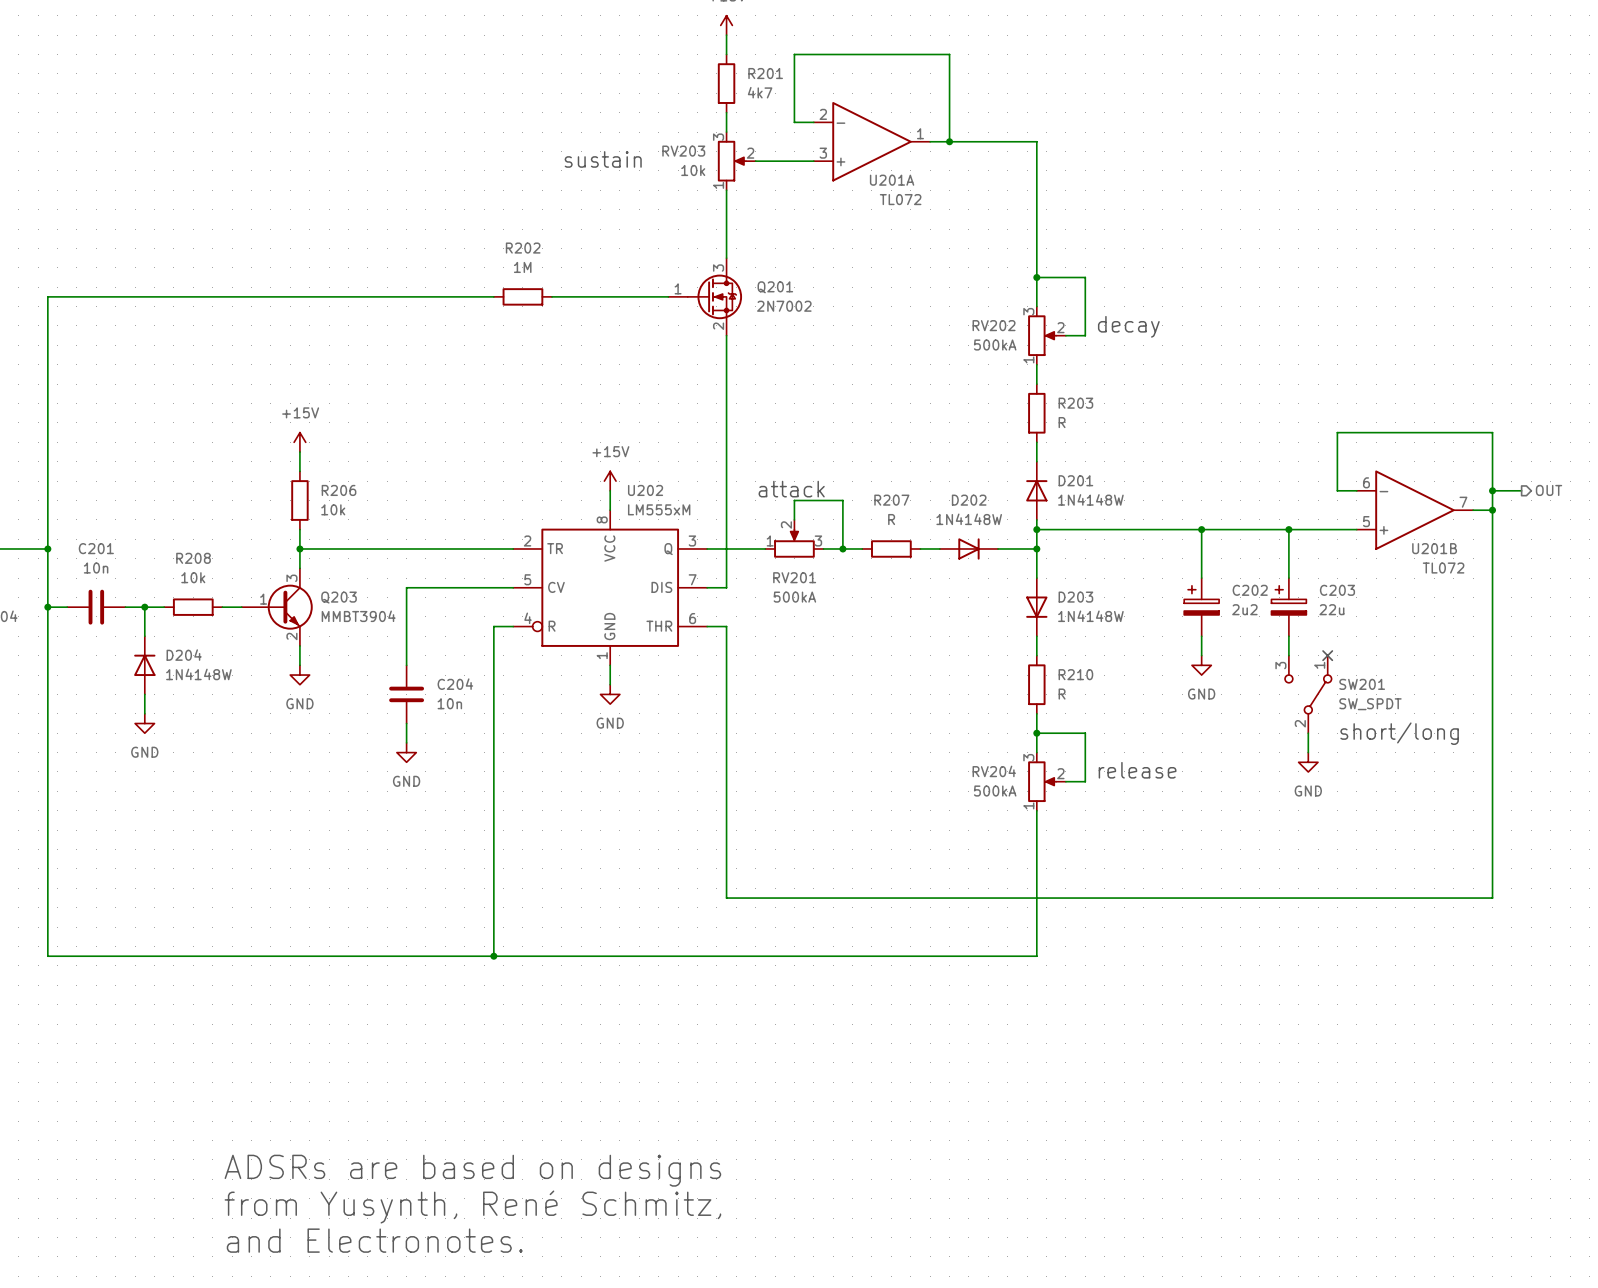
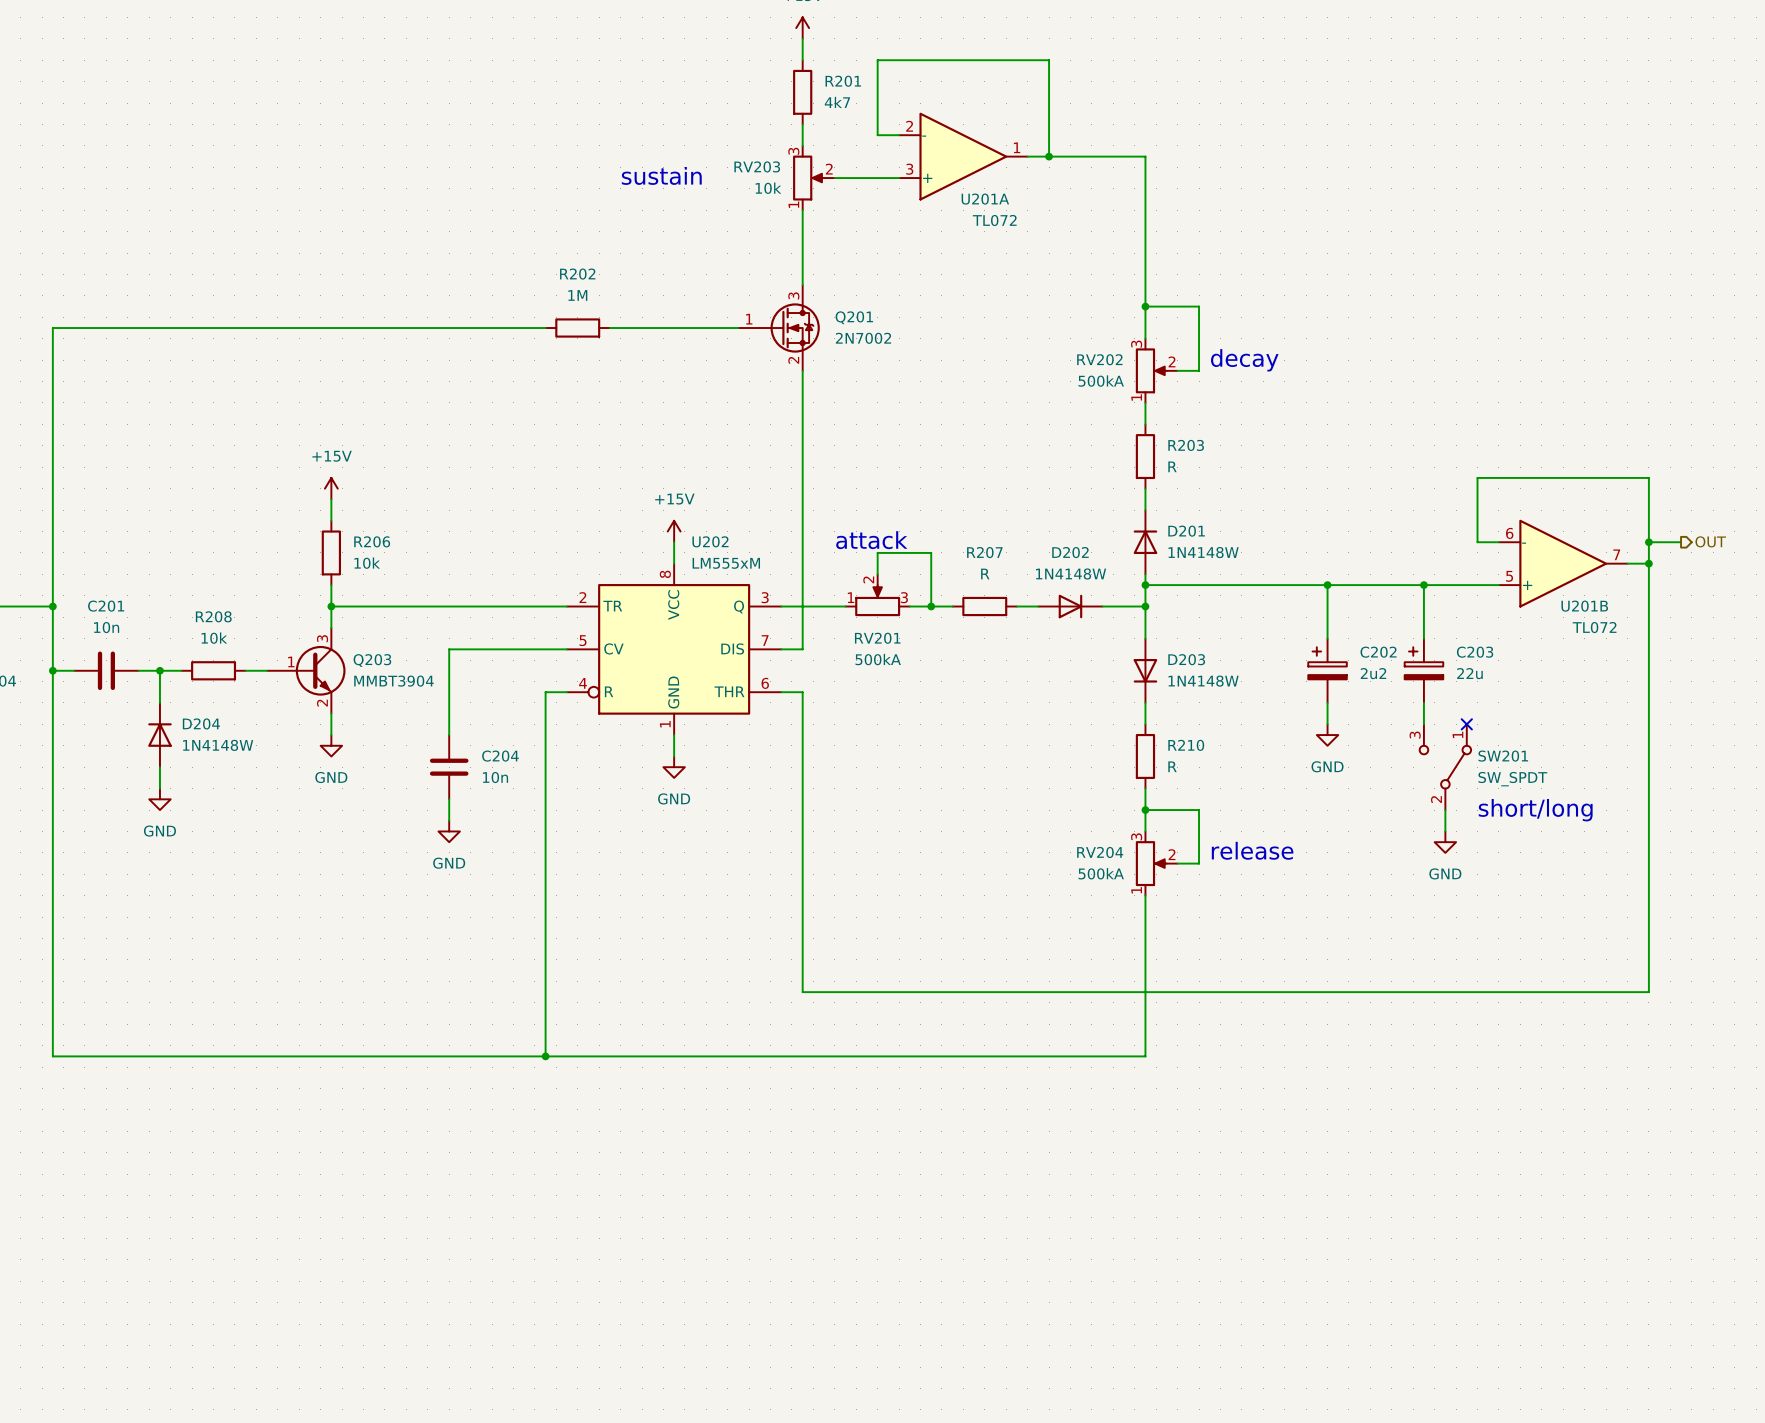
text: ADSRs are based on designs (472, 1170) -> none
text: from Yusynth, René Schmitz, (472, 1207) -> none
text: and Electronotes. (374, 1240) -> none

